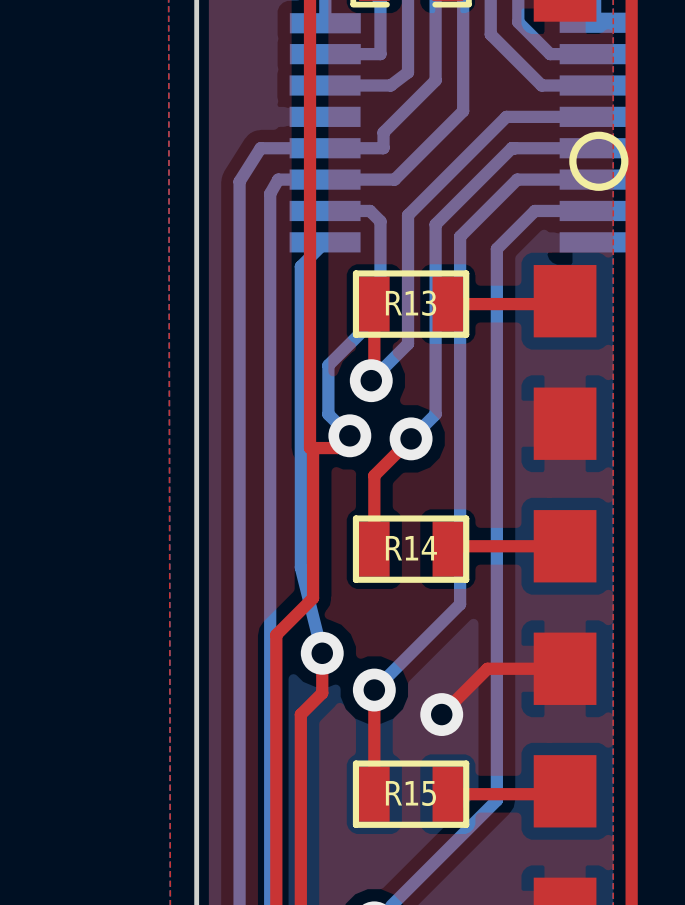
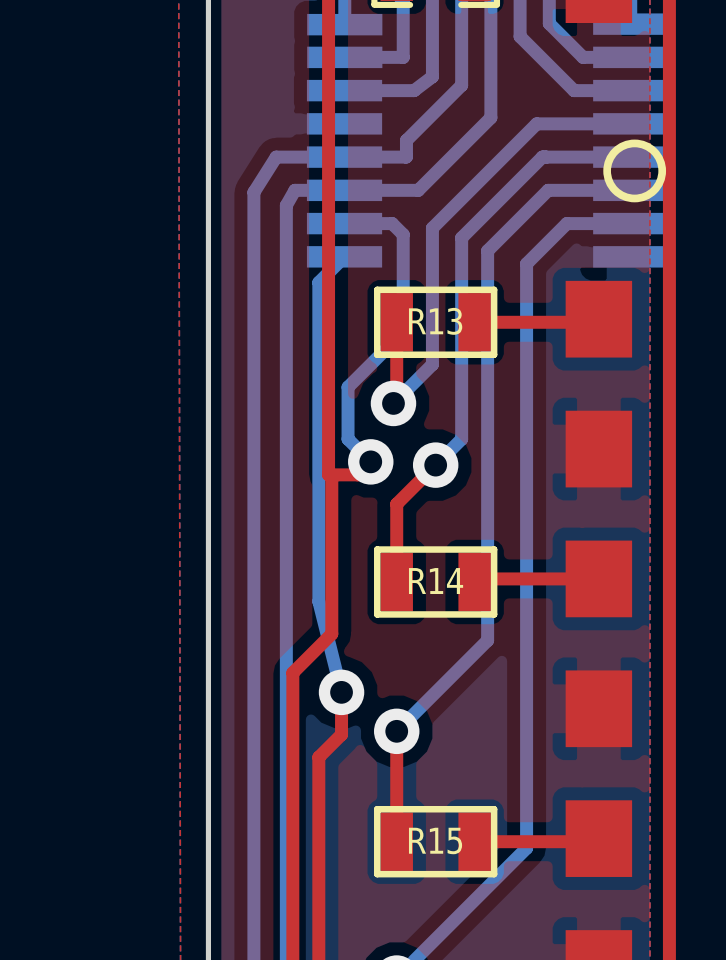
top track: (565, 668) (487, 668) (441, 714) -> none
via: (441, 714) -> none

